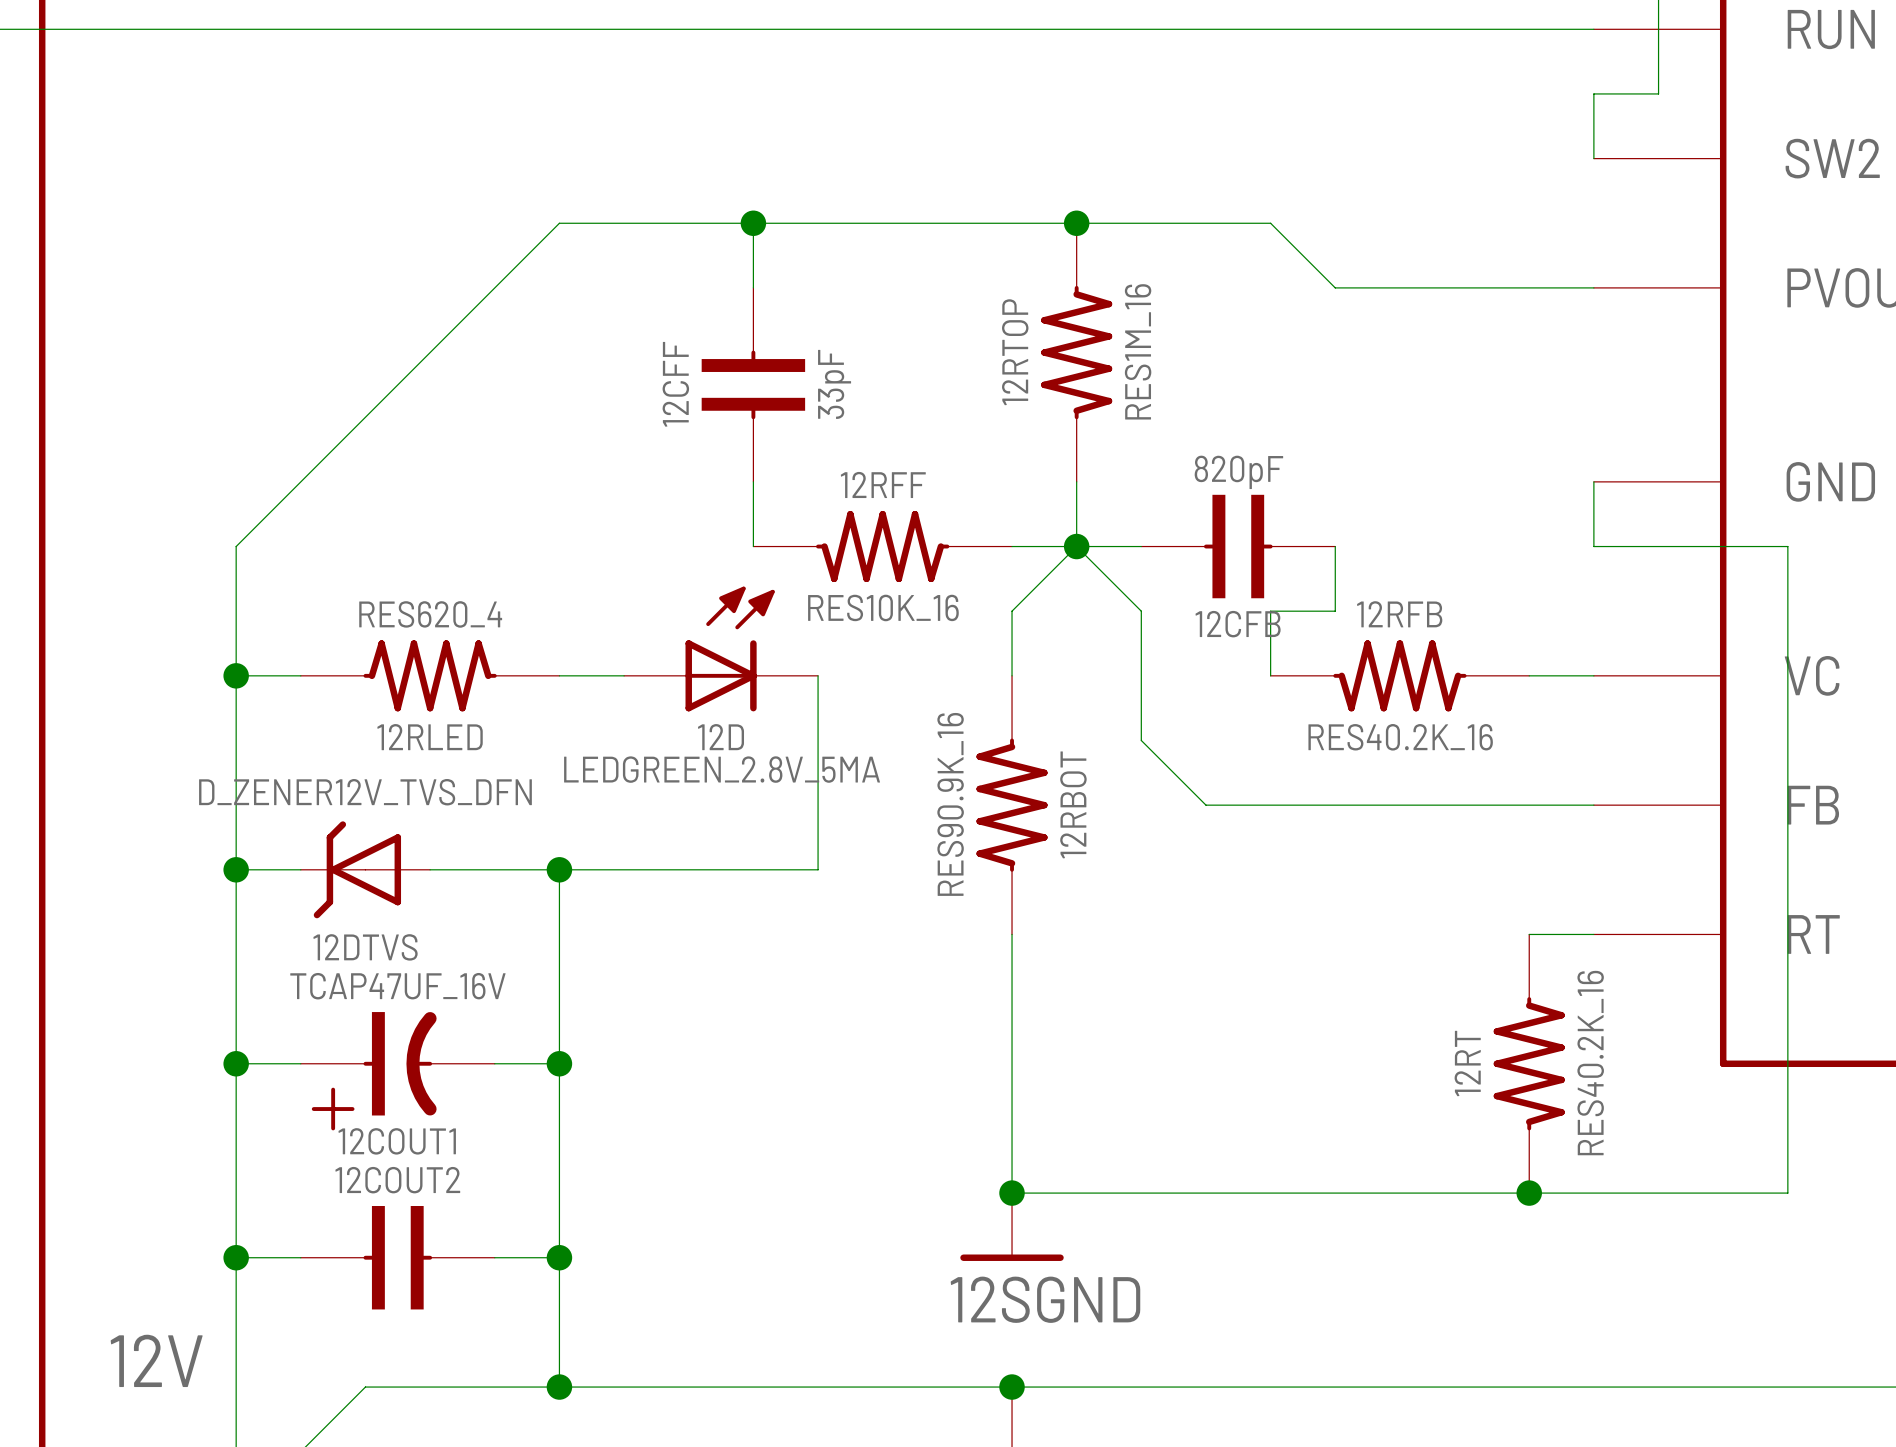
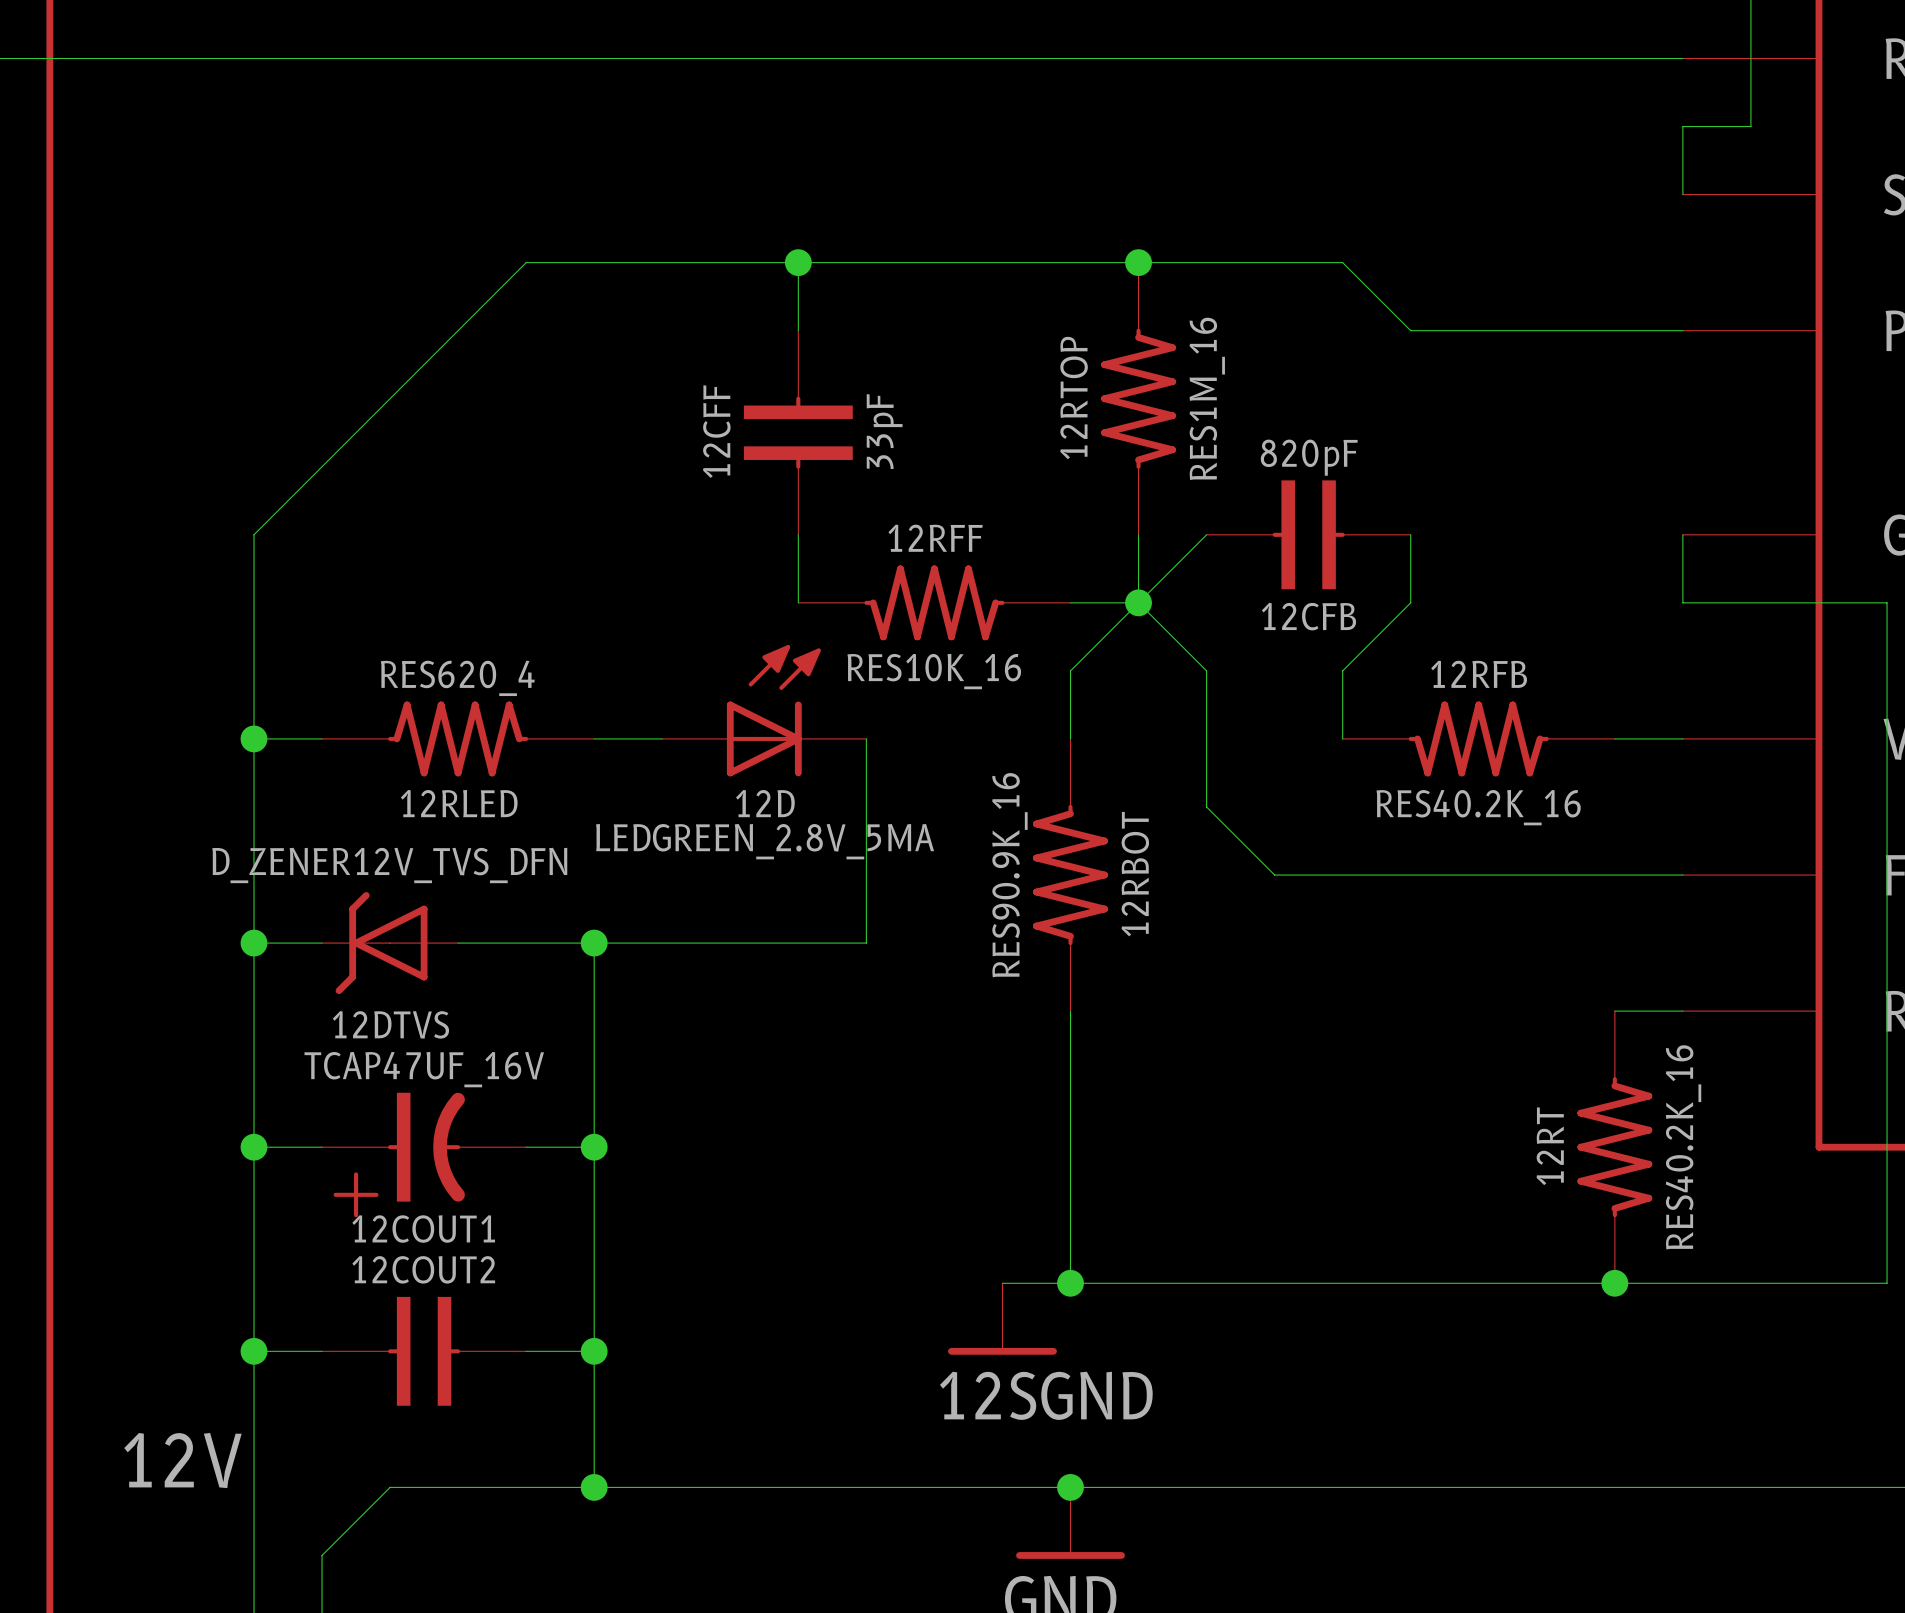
wire: (559, 223) (236, 546) -> (594, 262) (526, 262) (253, 534) (253, 602)
wire: (1076, 546) (1141, 546) -> (1138, 602) (1206, 534)
12CFB position: (1238, 546) -> (1308, 534)
wire: (1335, 546) (1335, 611) (1270, 611) -> (1410, 534) (1410, 602) (1342, 670)
wire: none -> (1002, 1283) (1070, 1283)
power symbol position: 12SGND (1012, 1227) -> 12SGND (1002, 1319)

